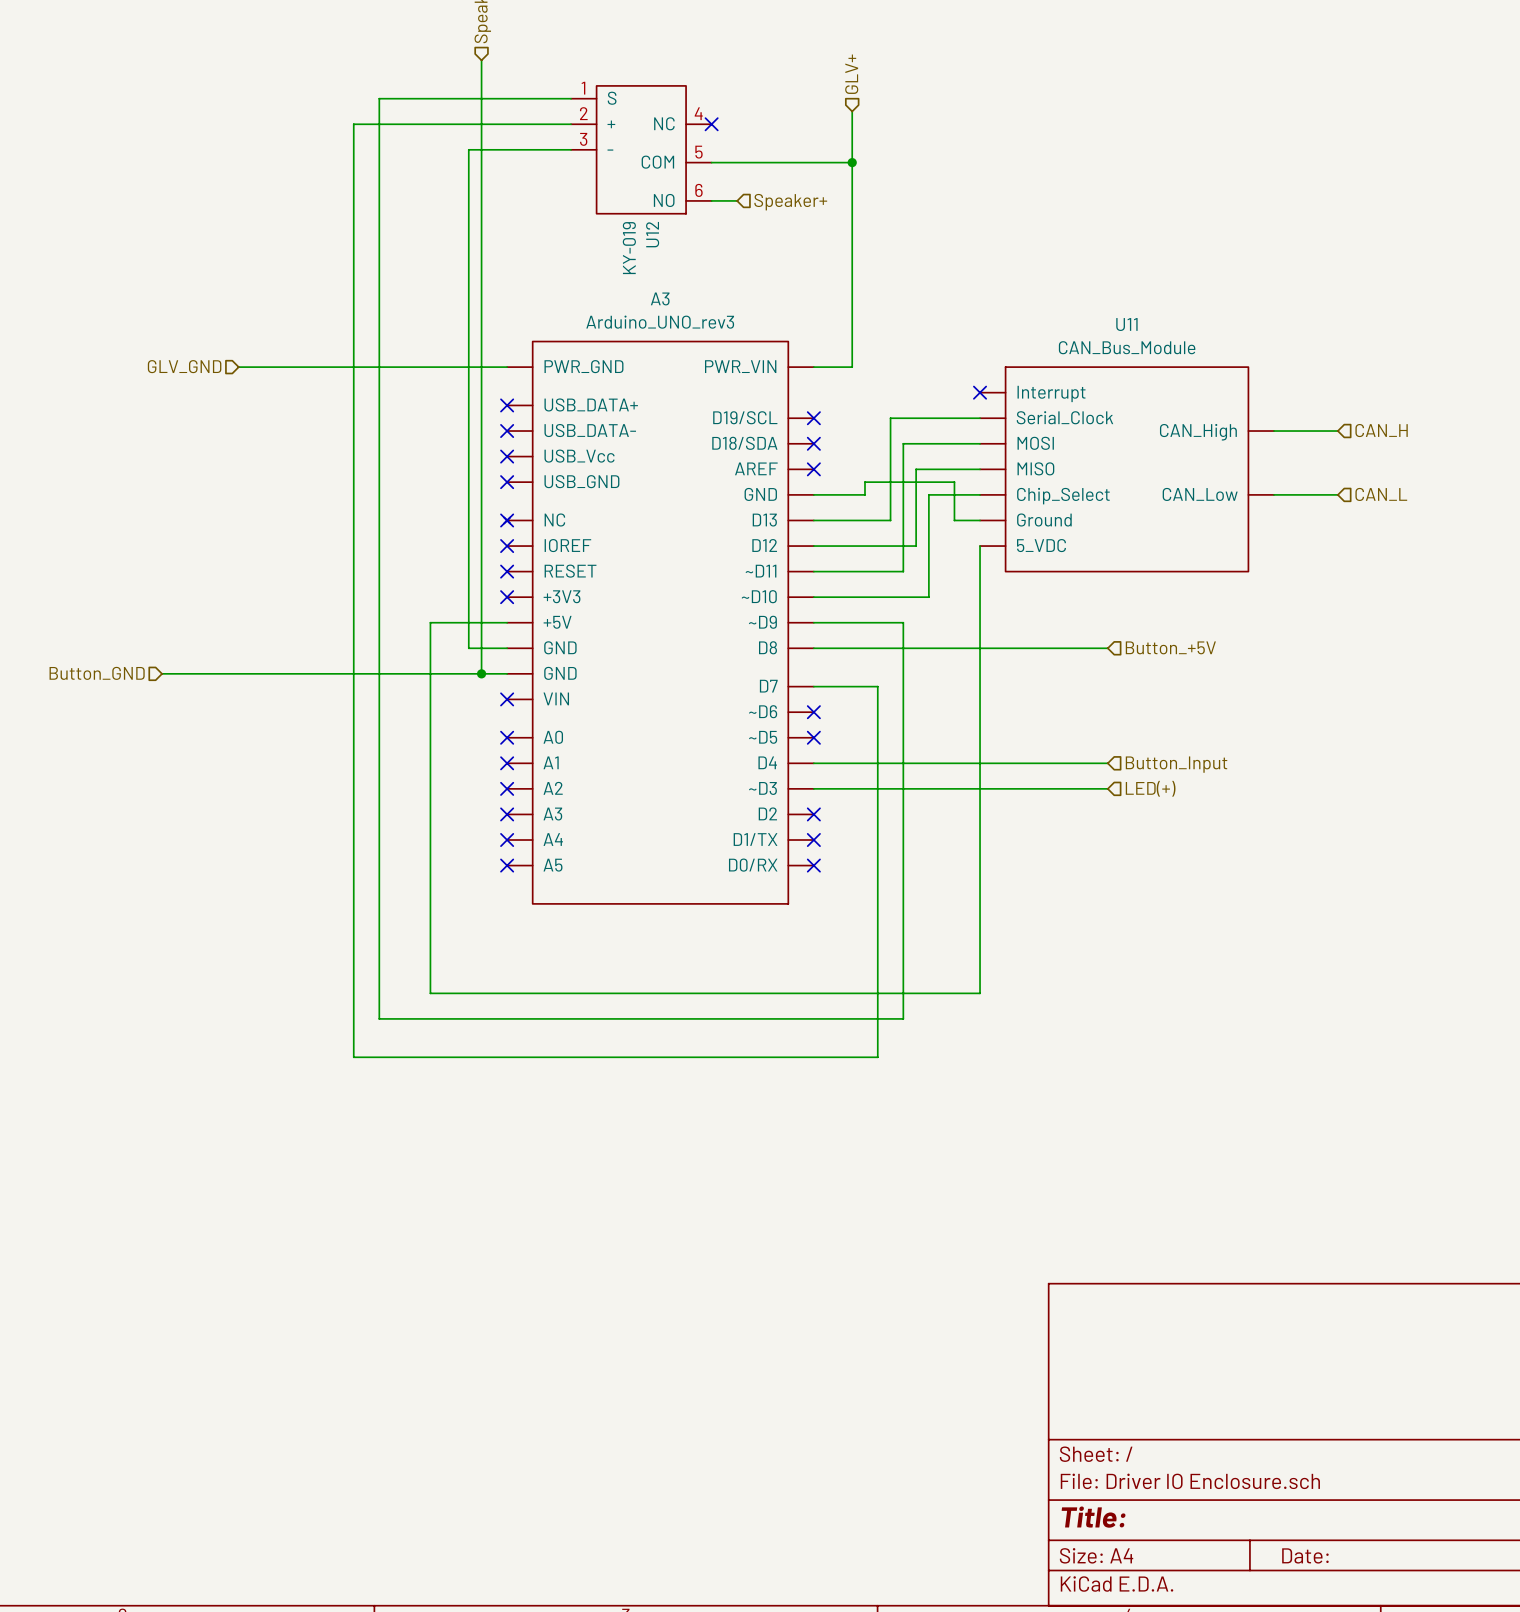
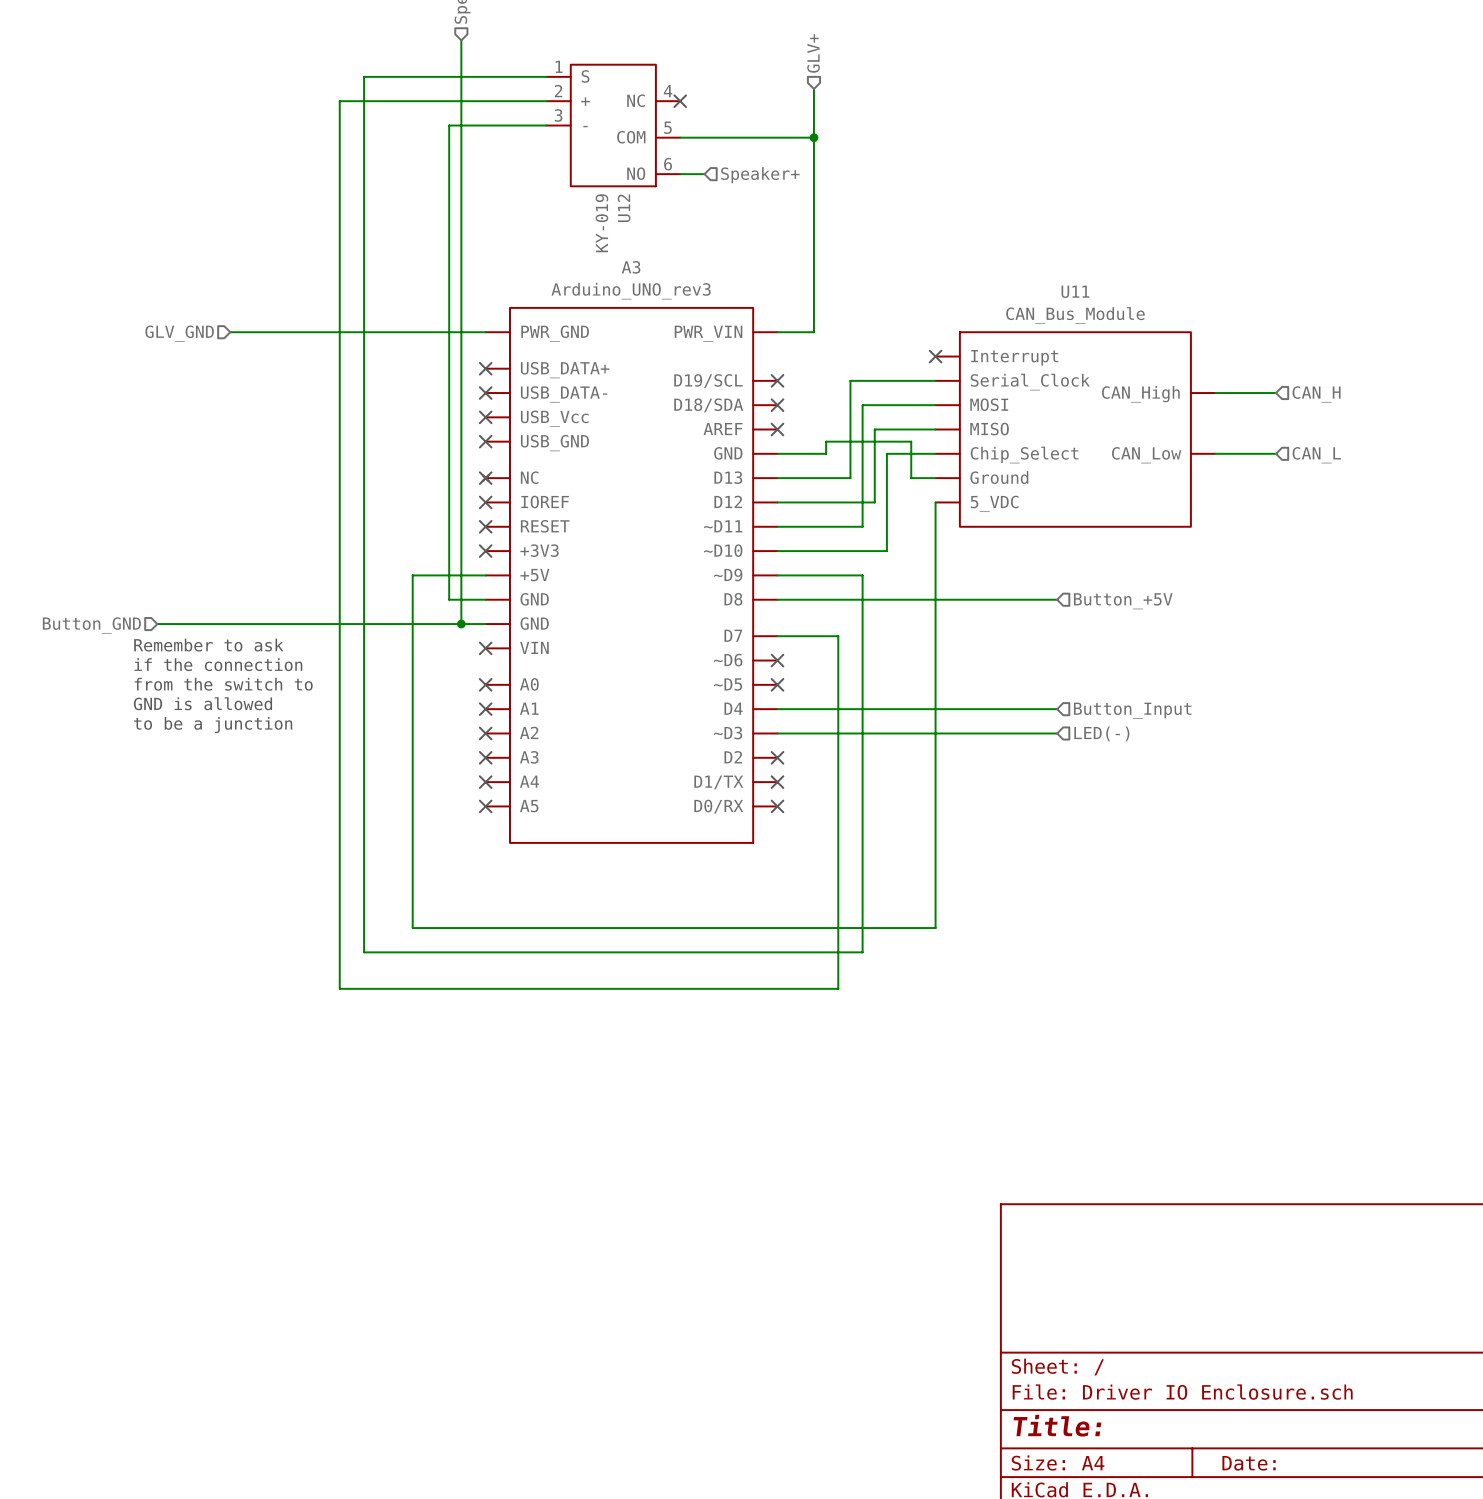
text: none -> Remember to ask (208, 645)
text: none -> if the connection (218, 664)
text: none -> from the switch to (223, 684)
text: none -> GND is allowed (202, 703)
text: none -> to be a junction (213, 725)
hierarchical label: LED(+) (1150, 788) -> LED(-) (1101, 733)

